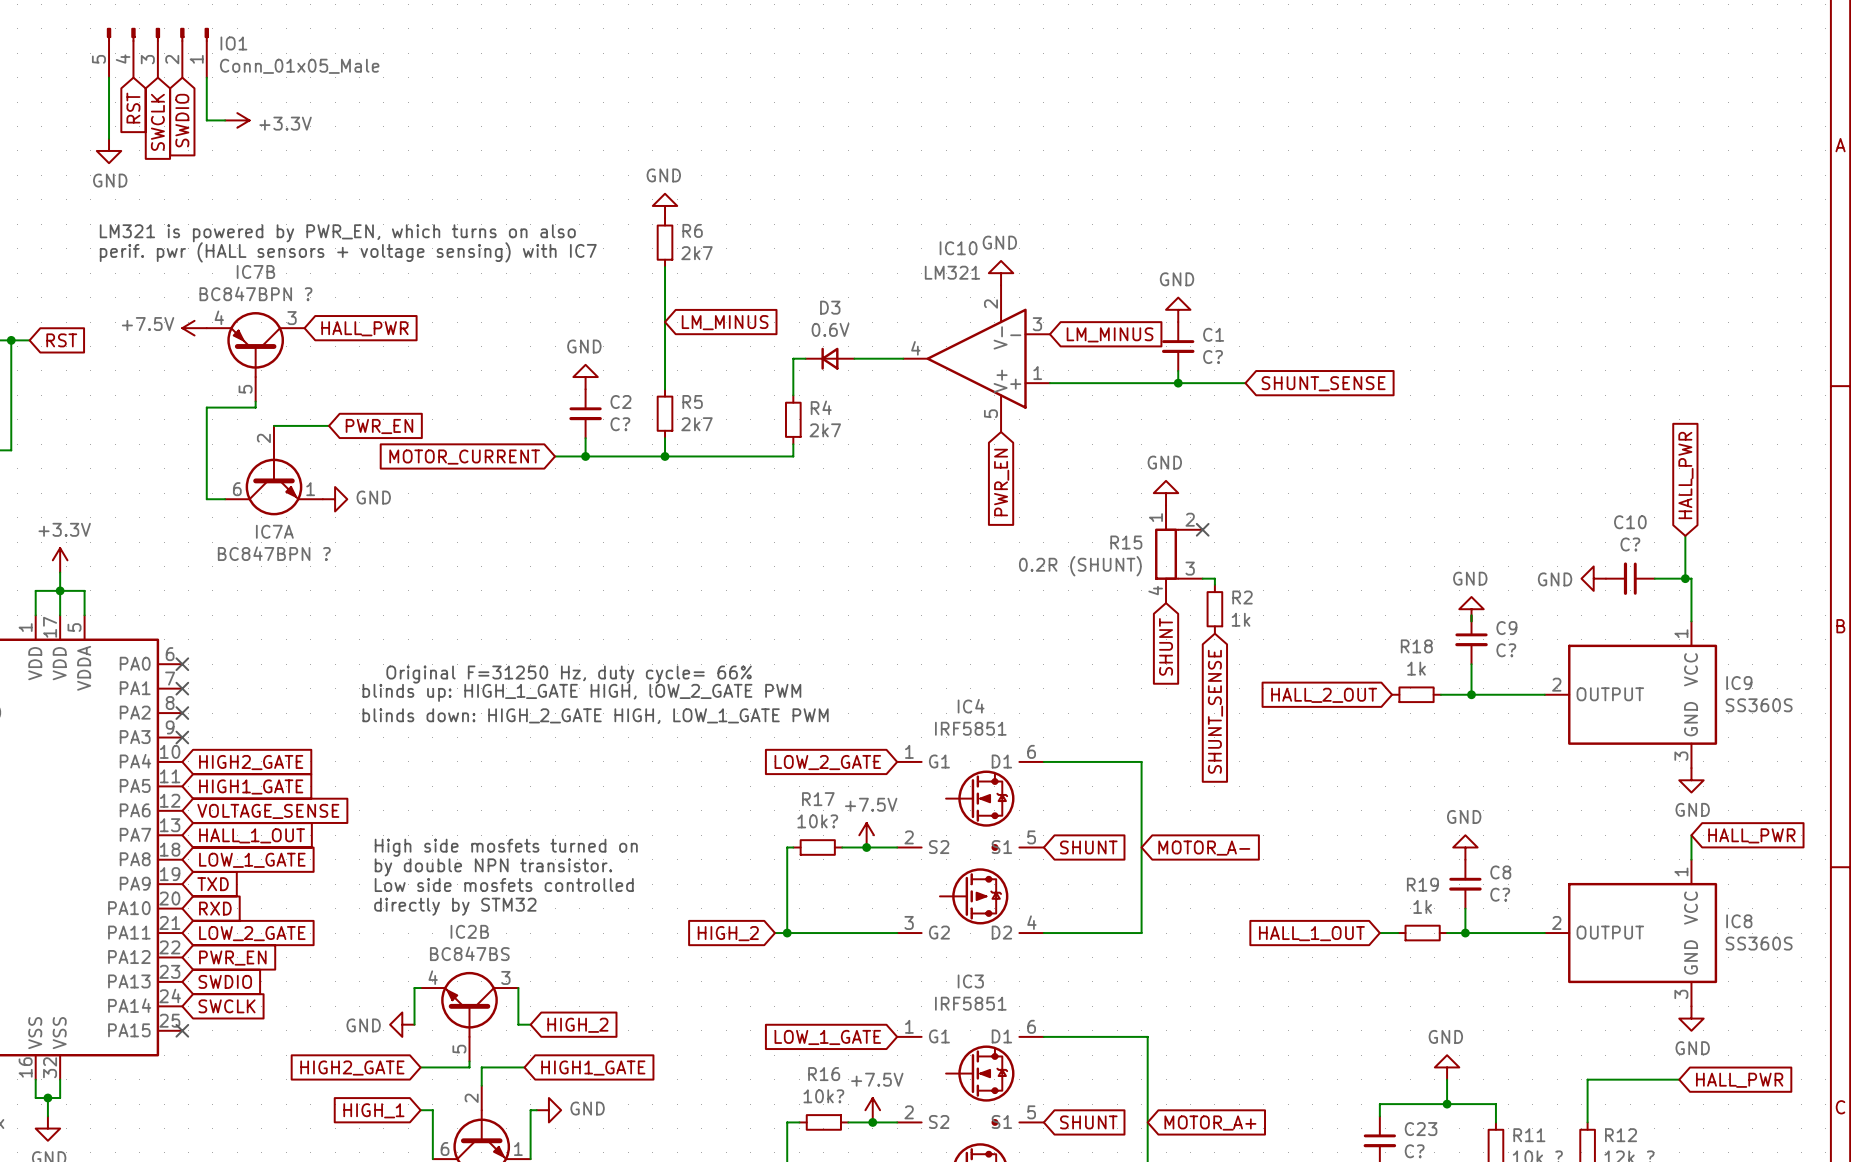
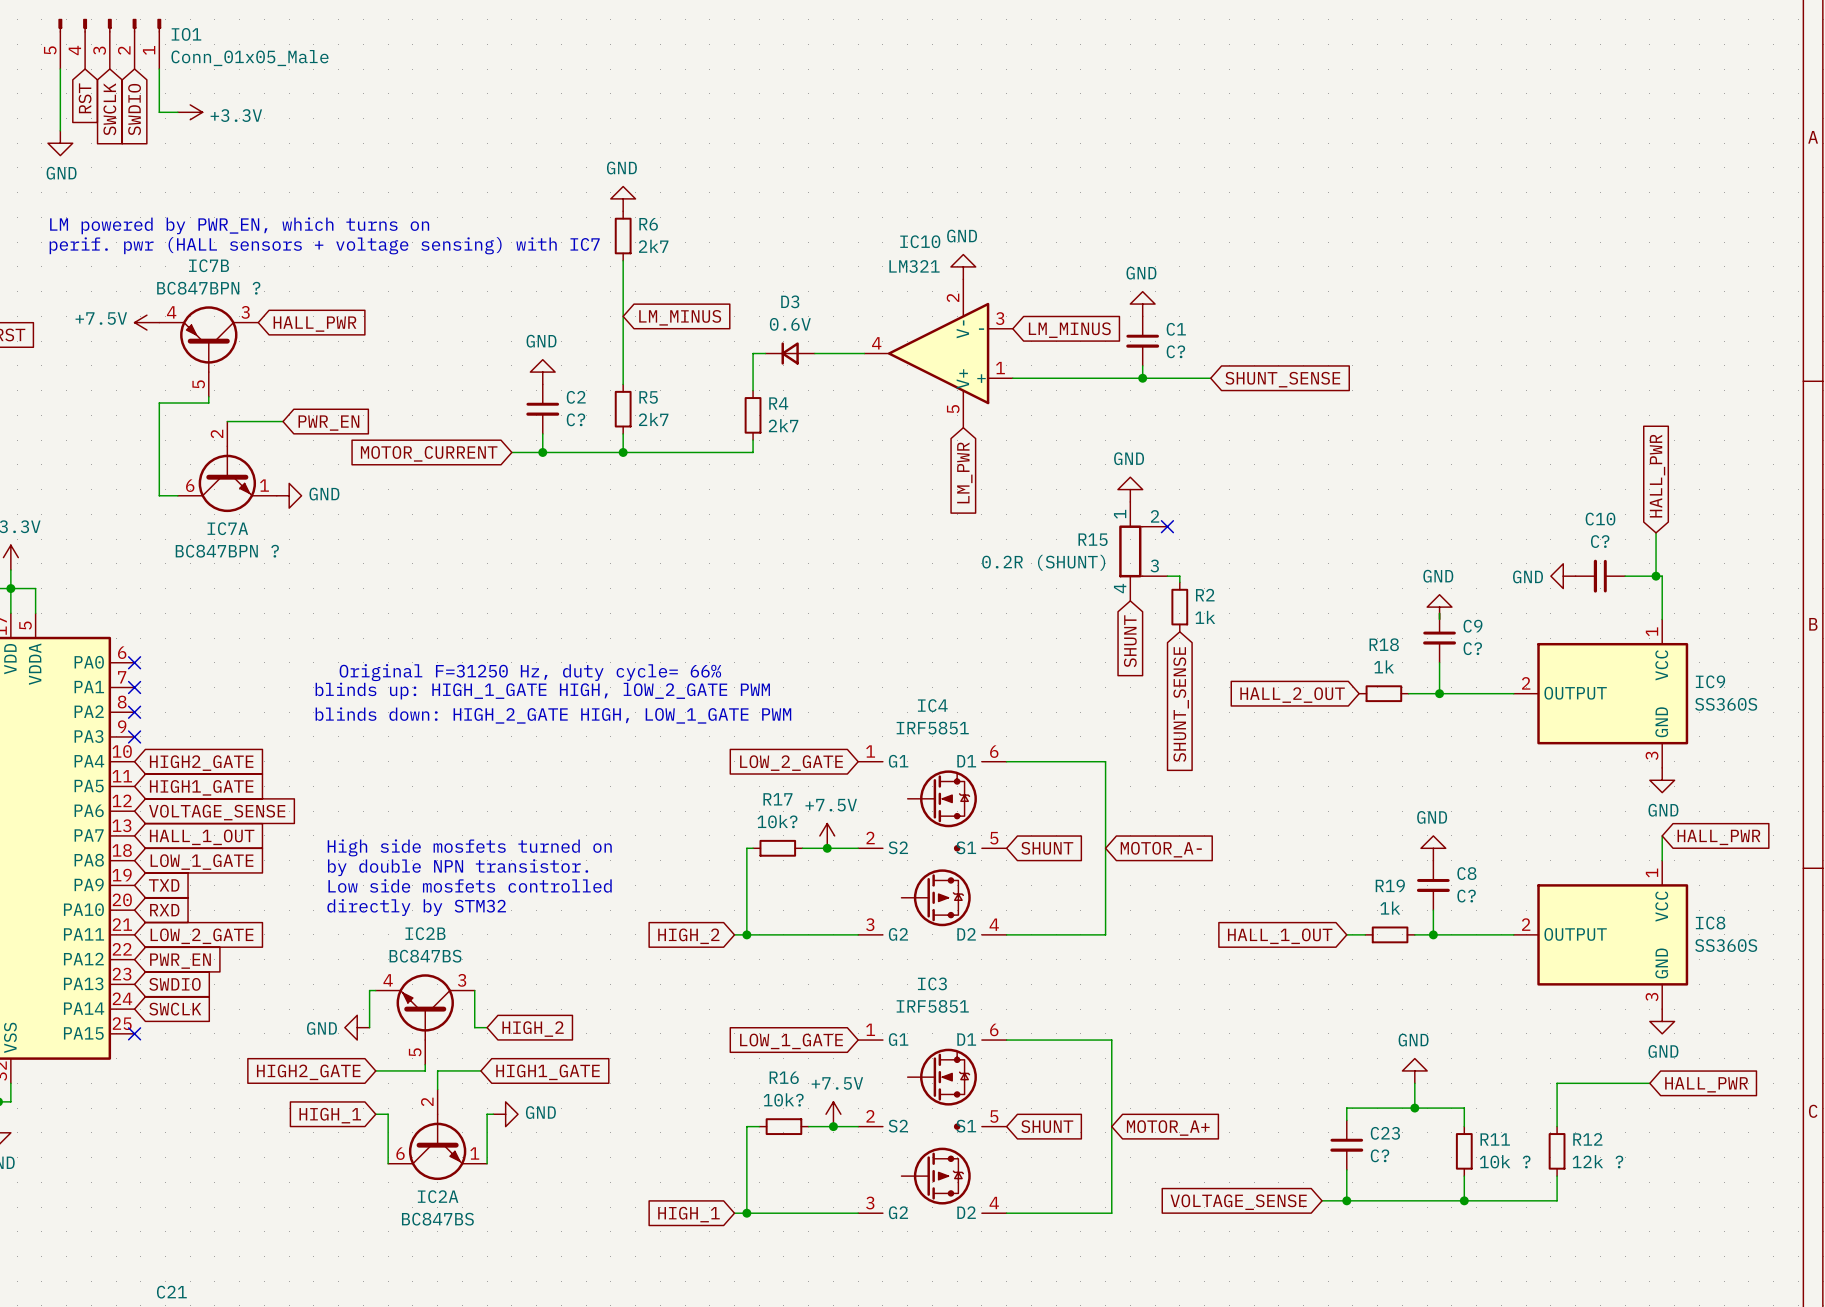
text: LM321 is powered by PWR_EN, which turns on also (337, 233) -> LM powered by PWR_EN, which turns on (239, 225)
global label: PWR_EN (1001, 482) -> LM_PWR (964, 472)

